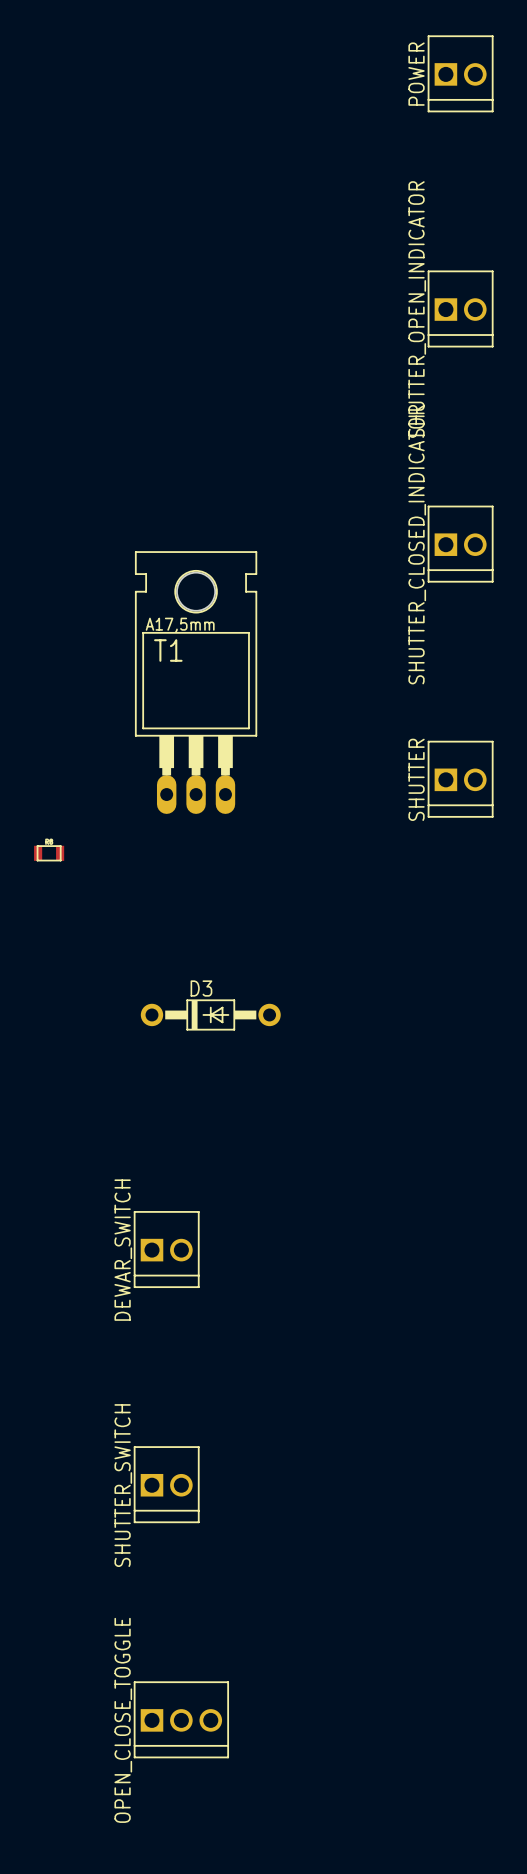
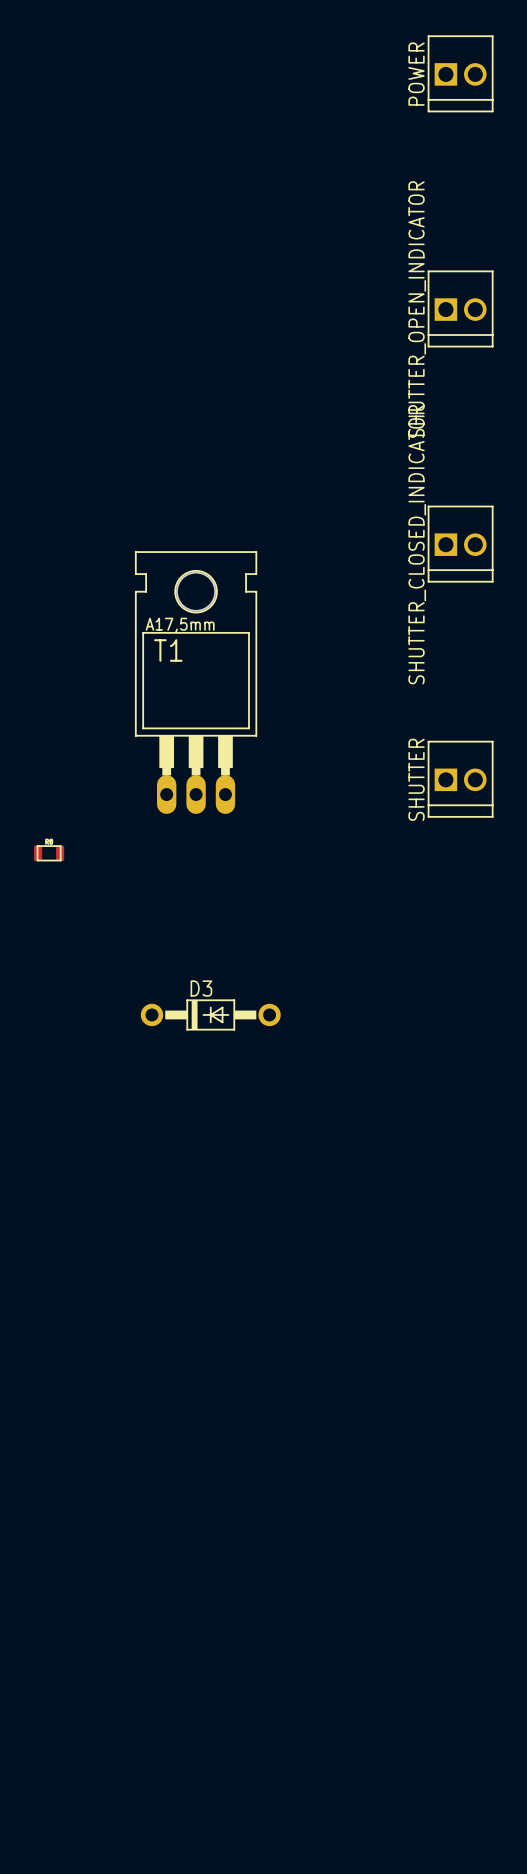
DEWAR_SWITCH: (166, 1249) -> none
SHUTTER_SWITCH: (166, 1484) -> none
OPEN_CLOSE_TOGGLE: (181, 1719) -> none

